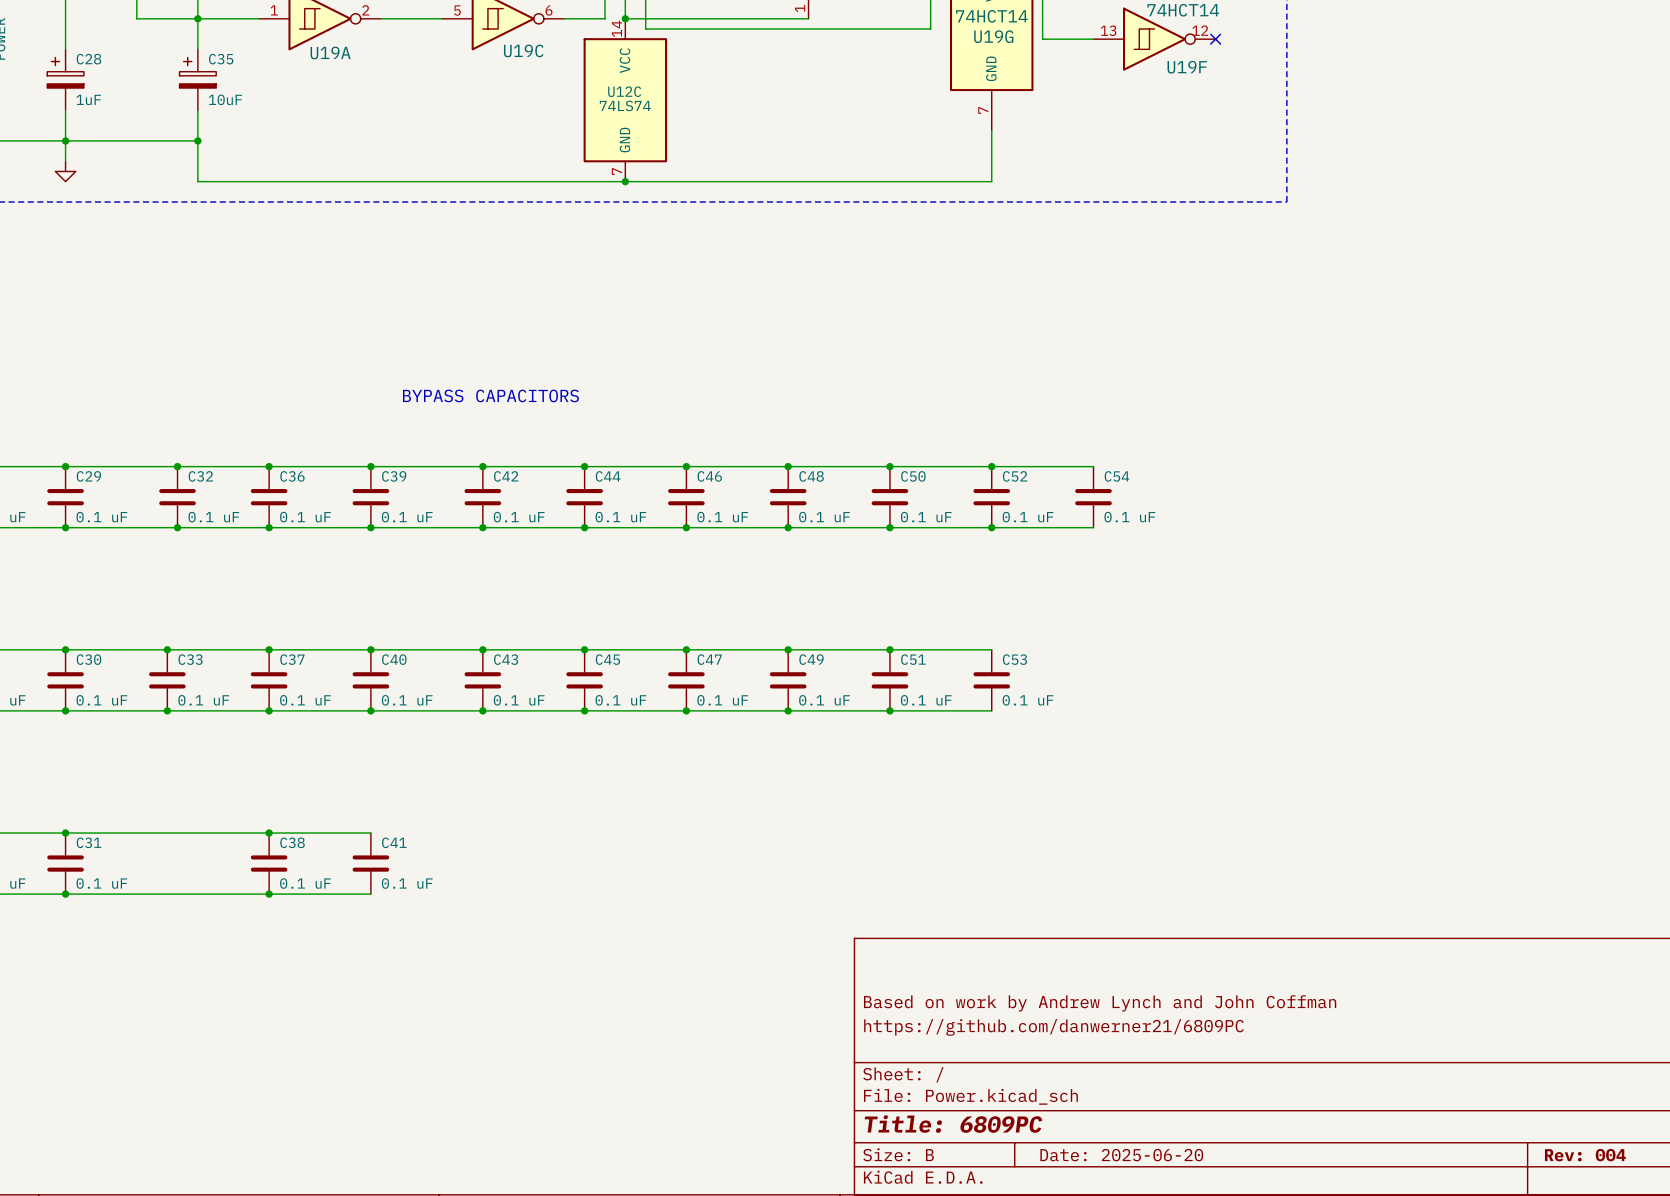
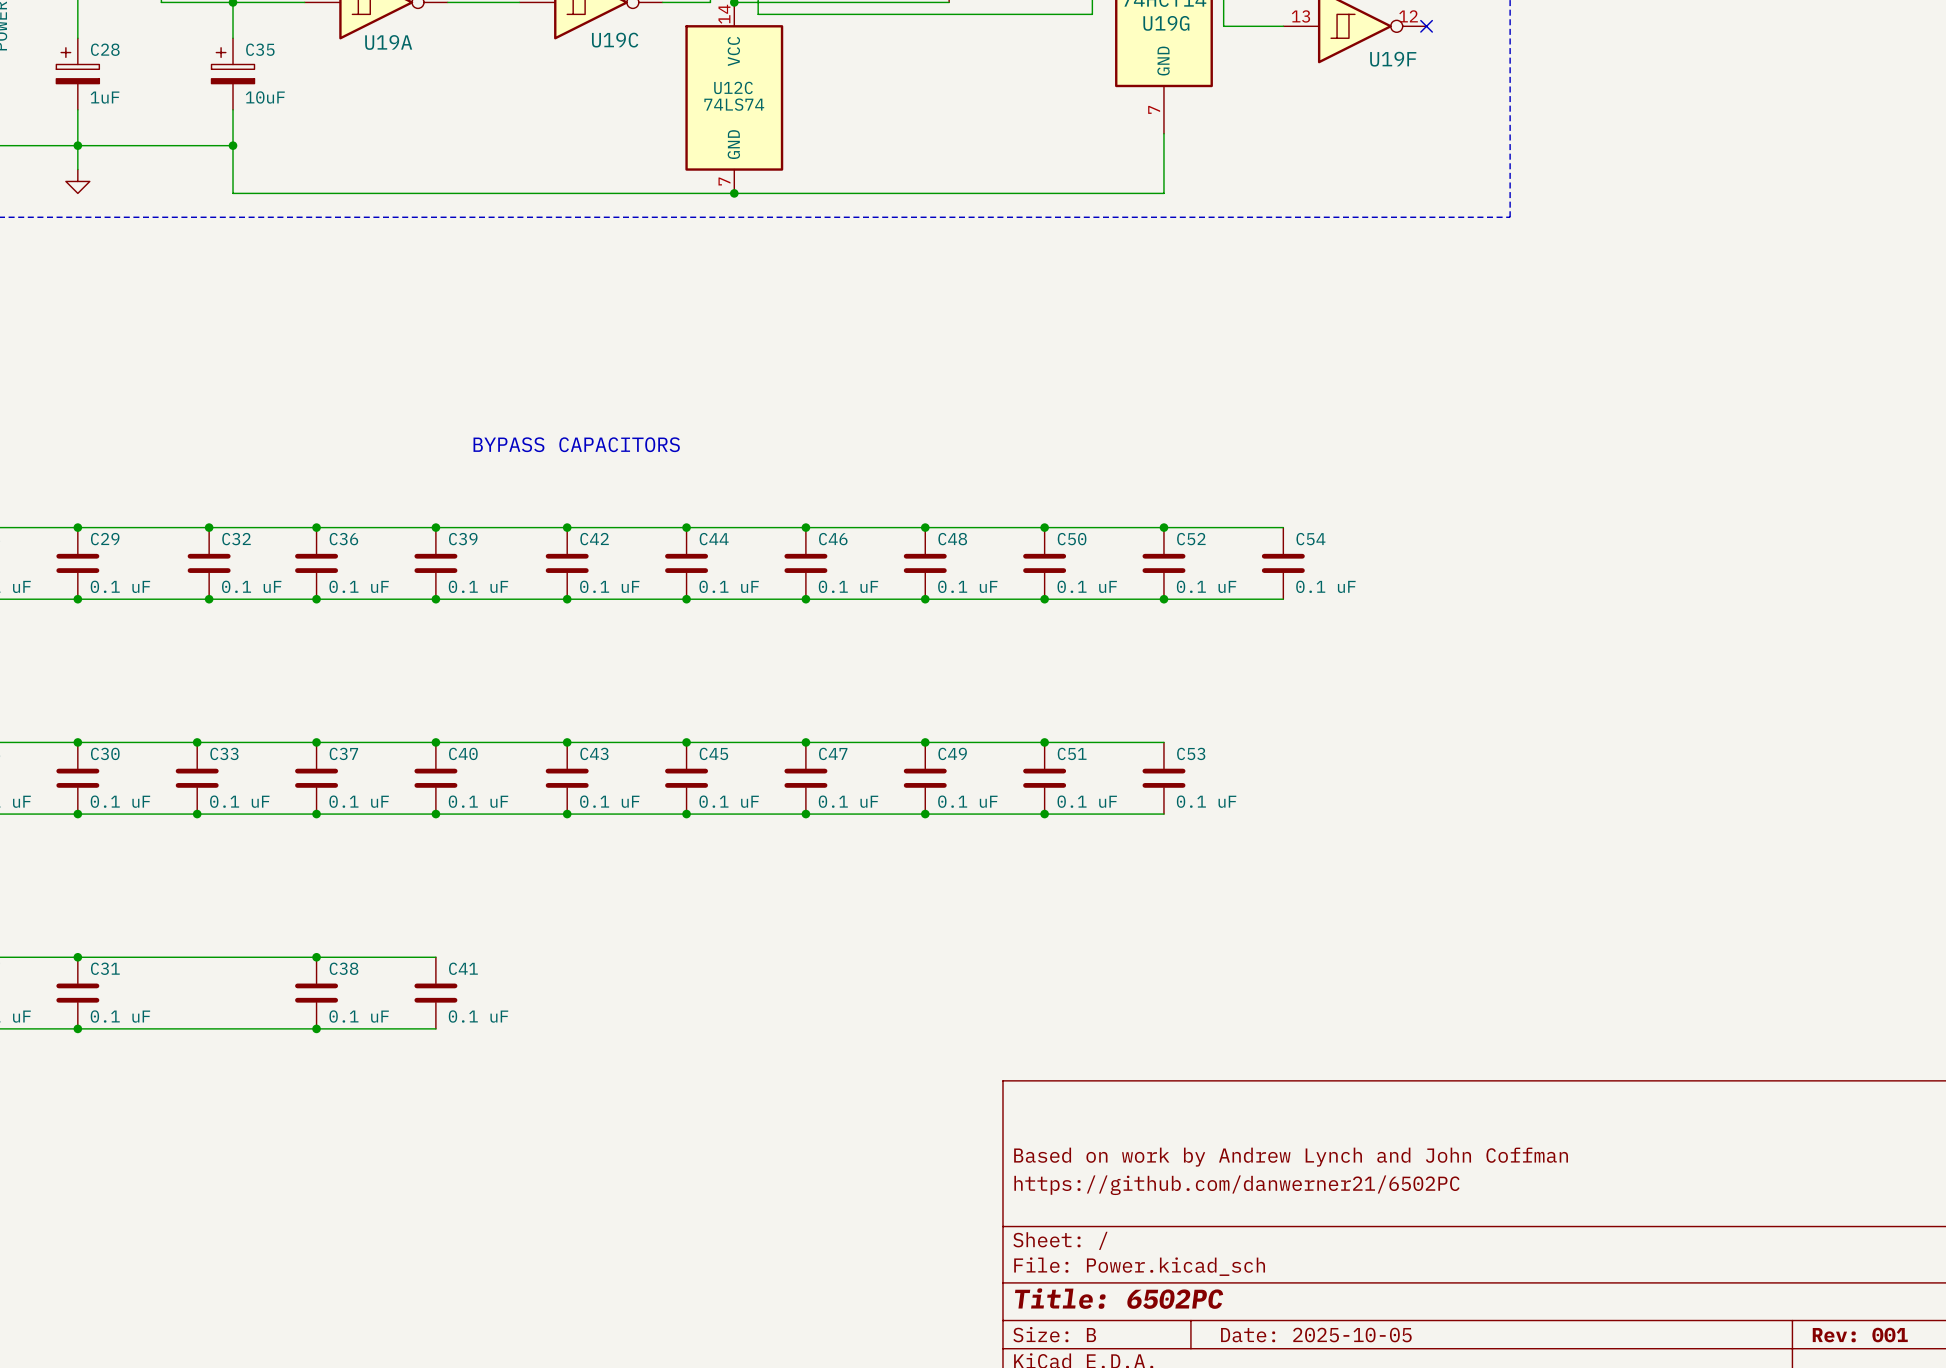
title block: https://github.com/danwerner21/6809PC (1053, 1027) -> https://github.com/danwerner21/6502PC (1236, 1185)
title block: Title: 6809PC (953, 1124) -> Title: 6502PC (1119, 1298)
title block: Date: 2025-06-20 (1121, 1155) -> Date: 2025-10-05 (1316, 1335)
title block: Rev: 004 (1585, 1155) -> Rev: 001 (1860, 1335)

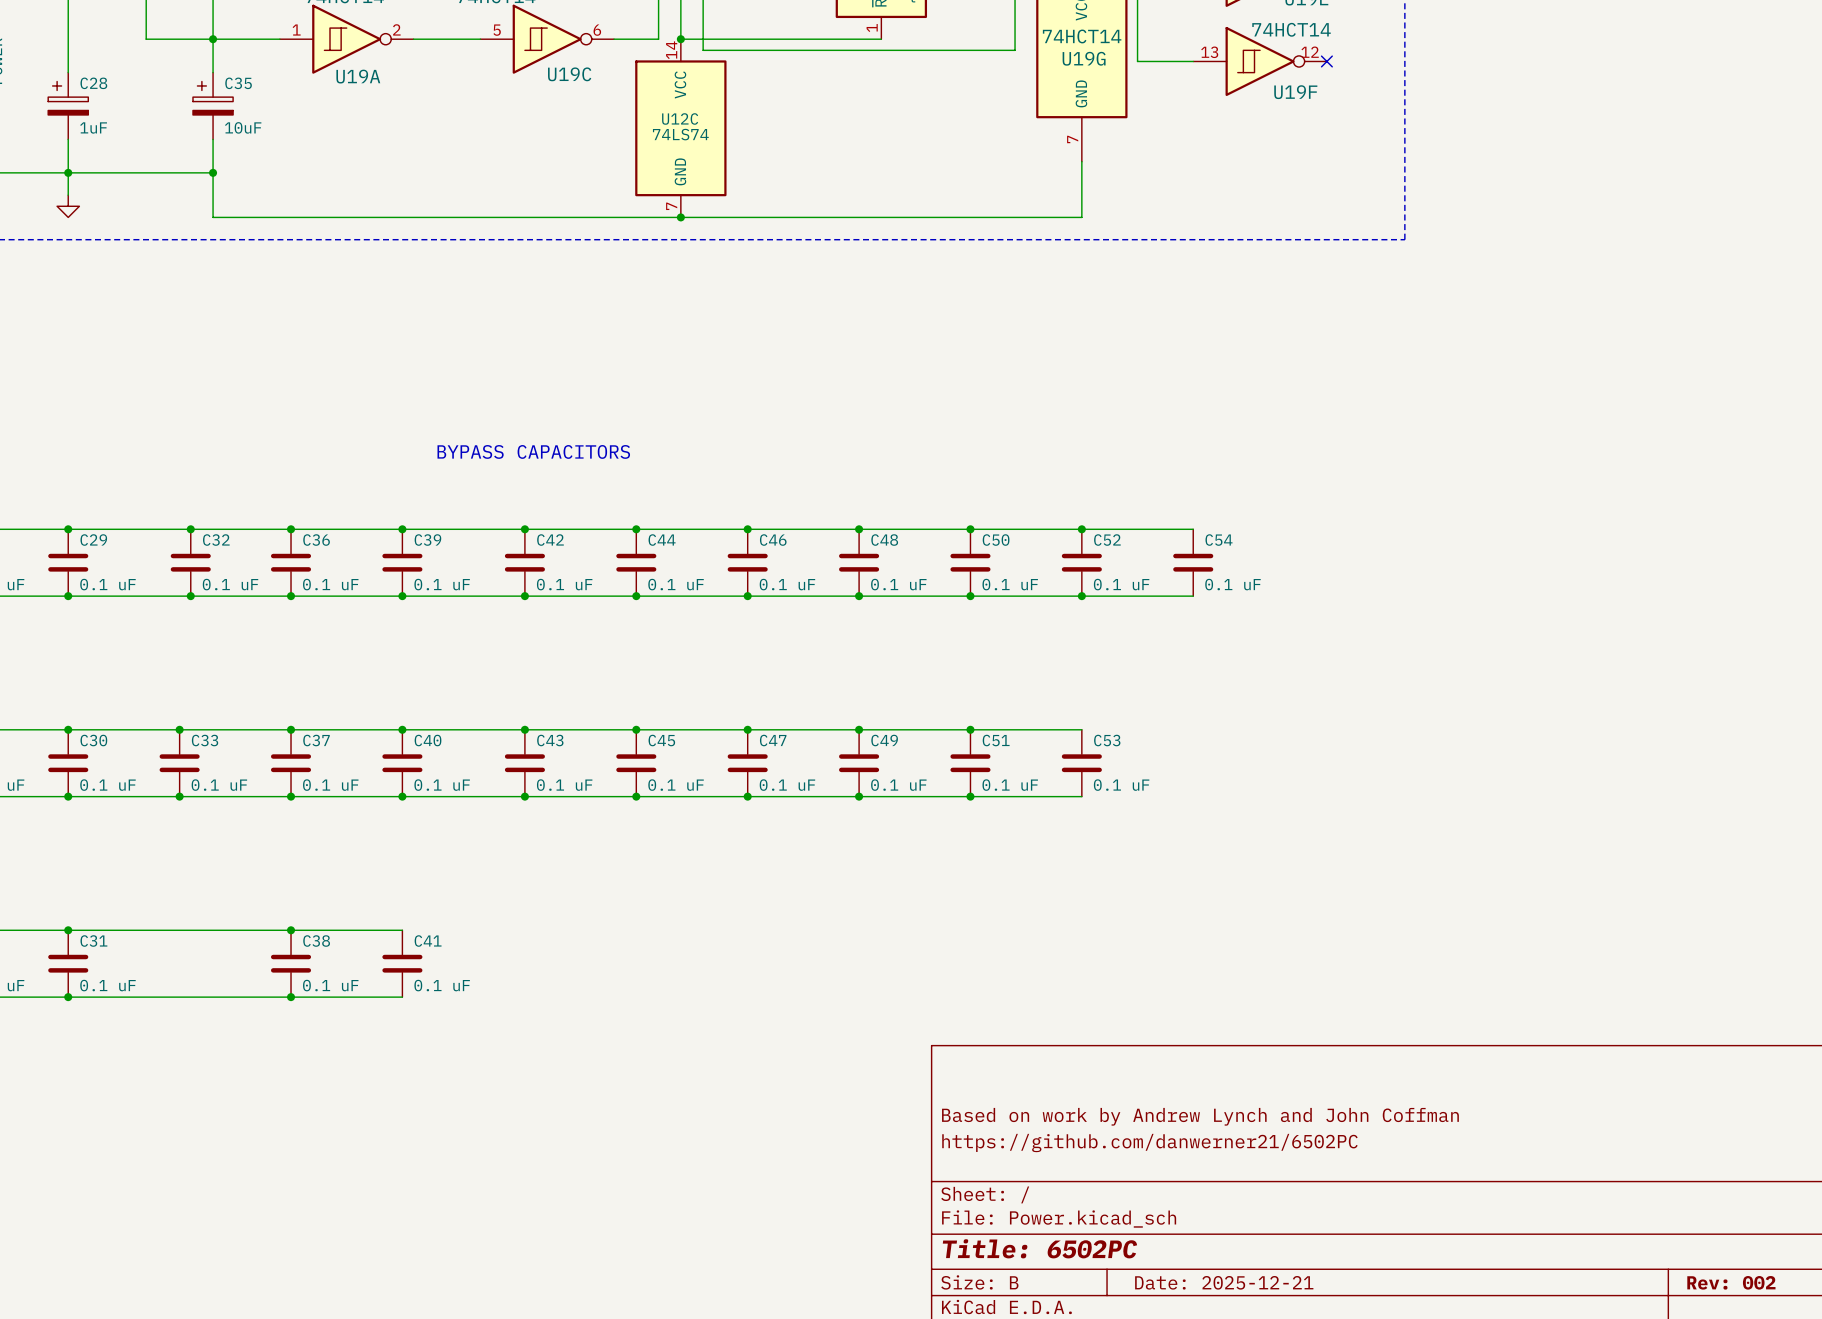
title block: Date: 2025-10-05 (1316, 1335) -> Date: 2025-12-21 (1224, 1282)
title block: Rev: 001 (1860, 1335) -> Rev: 002 (1731, 1282)

